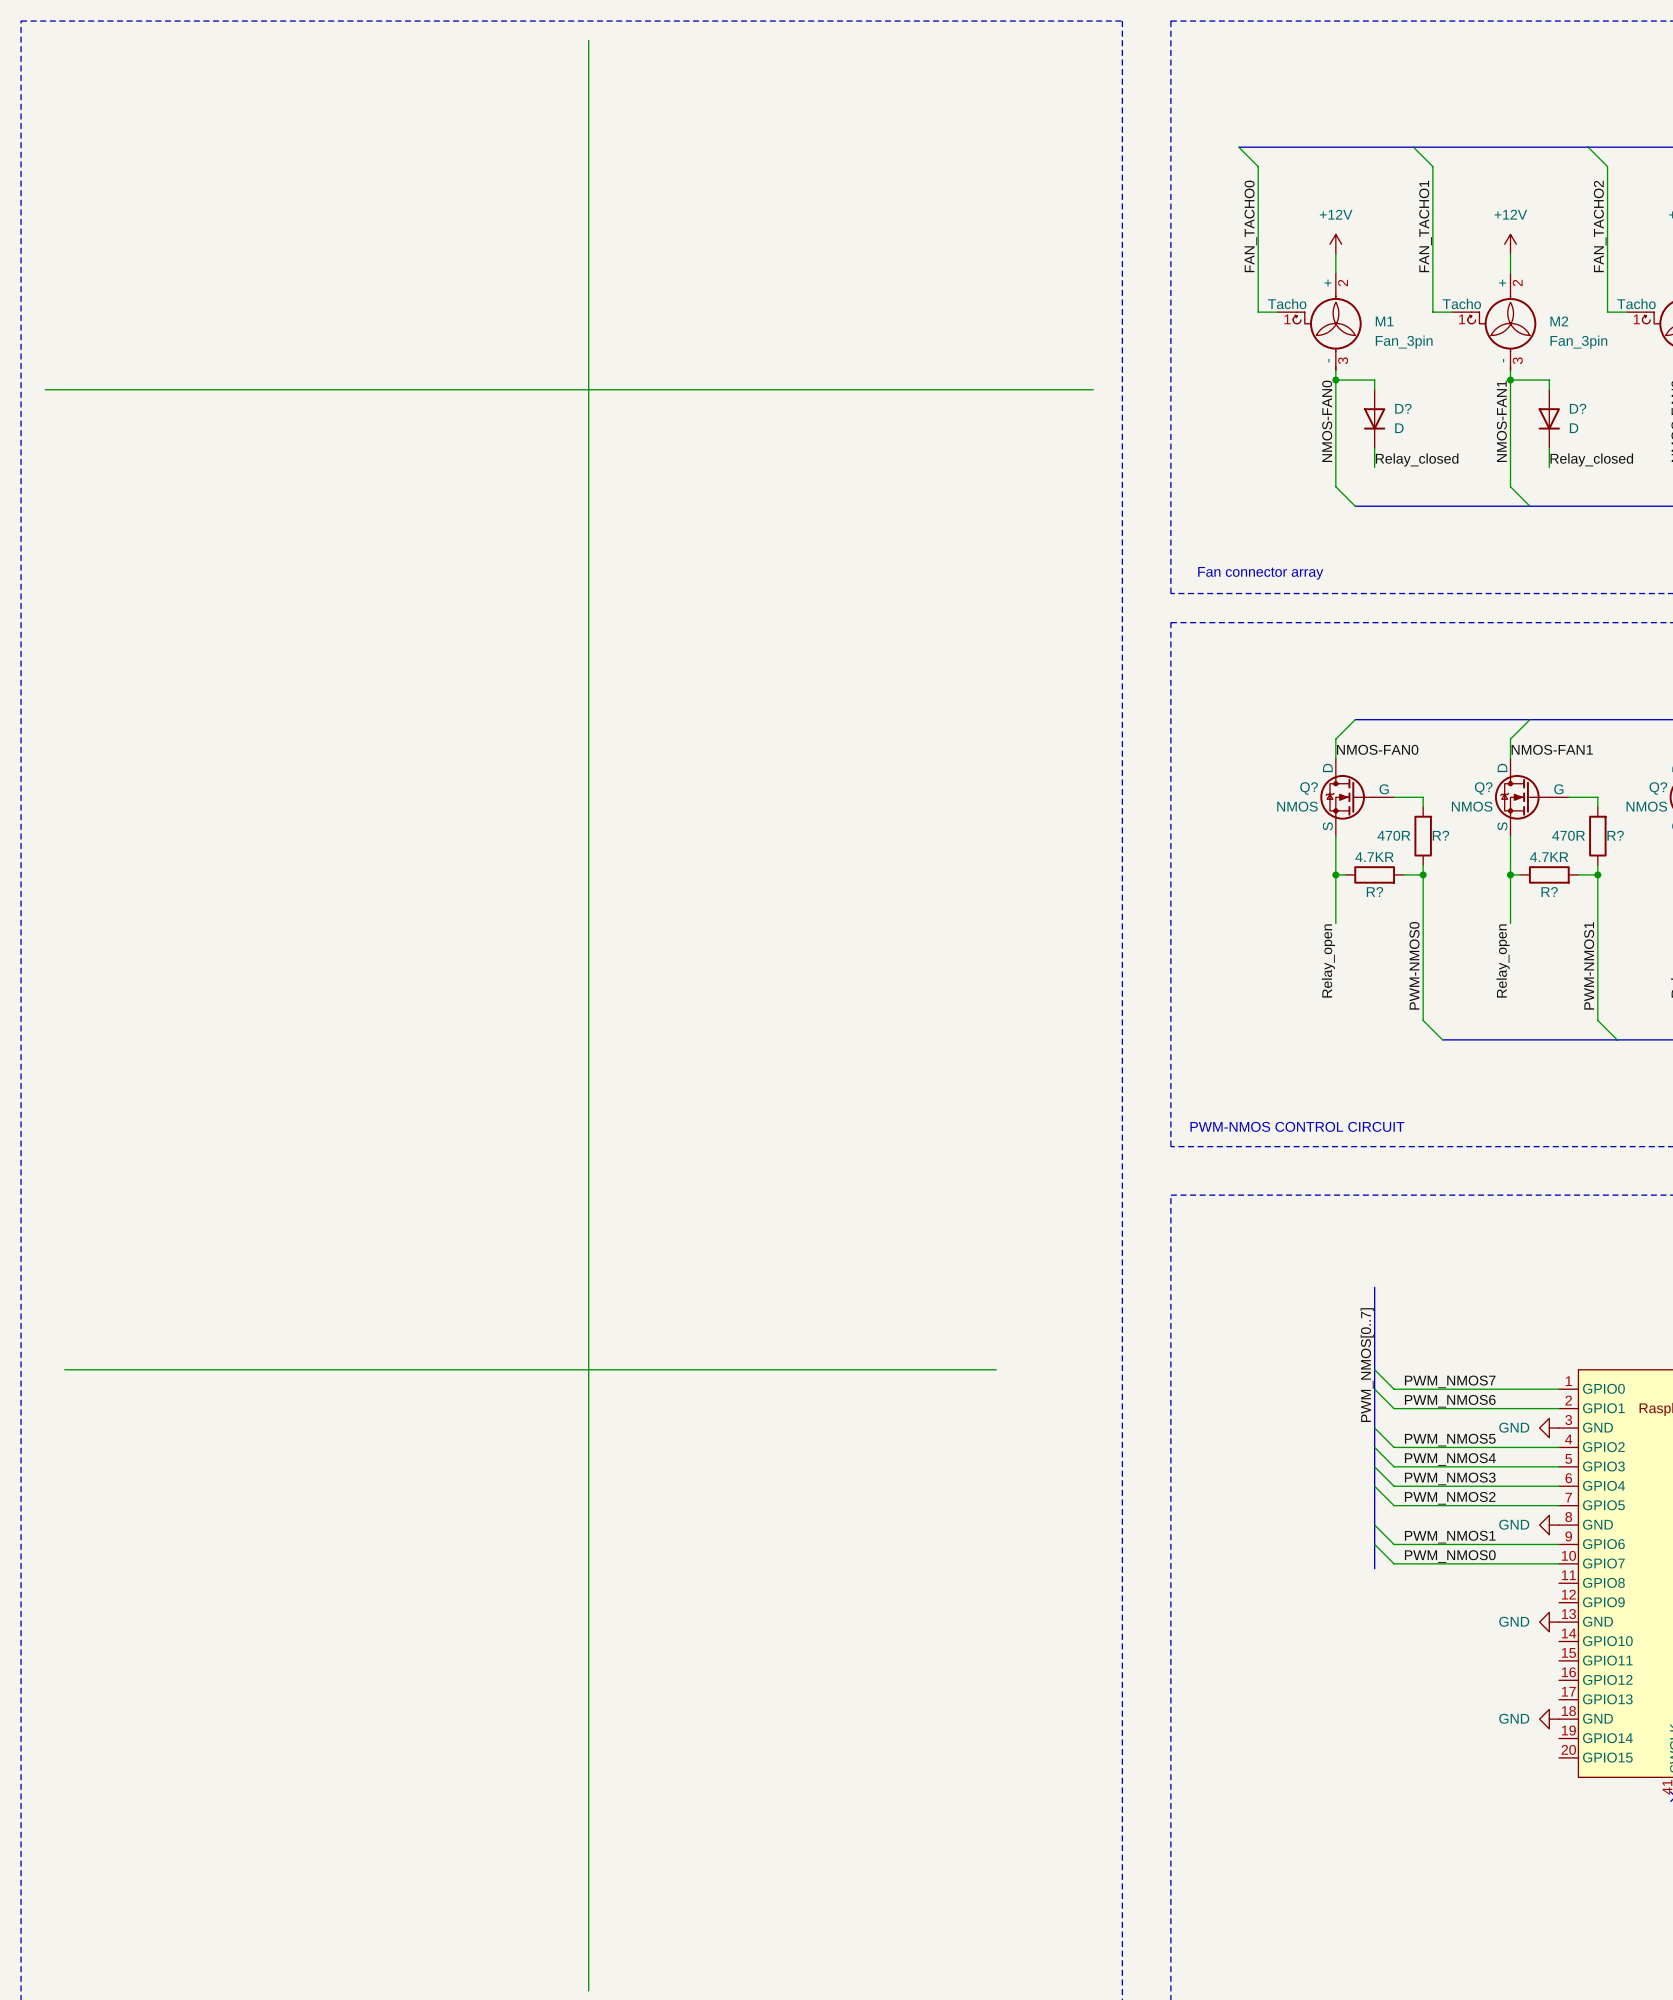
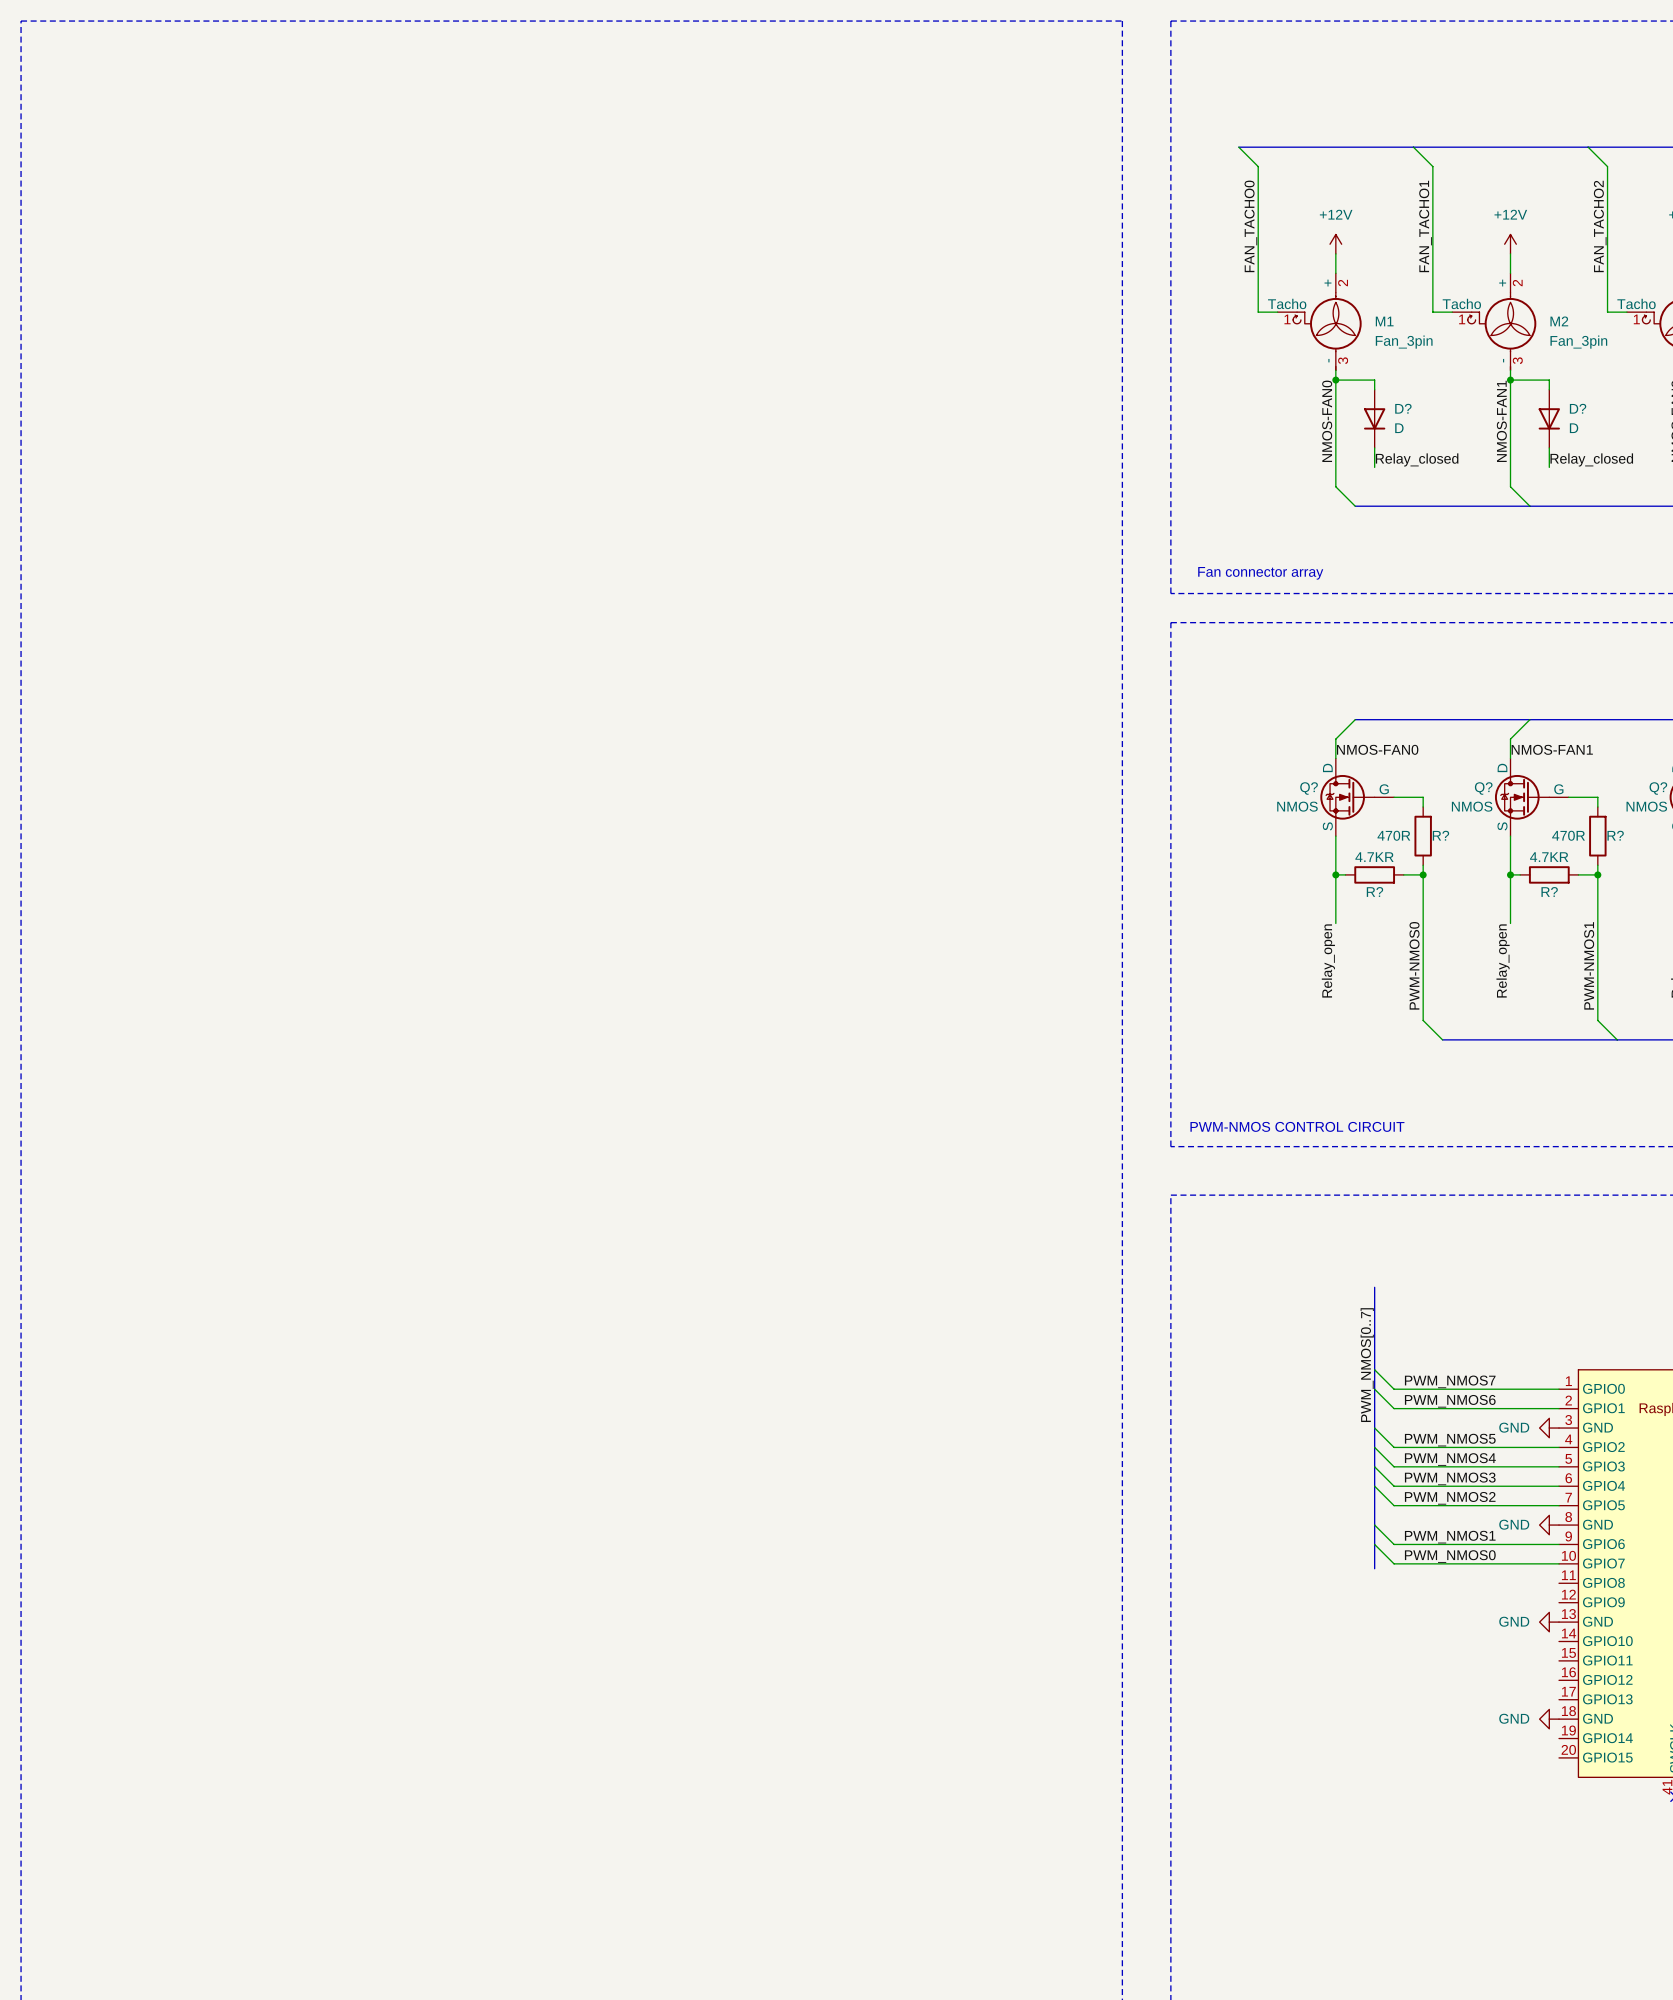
wire: (588, 40) (588, 1990) -> none
wire: (45, 389) (1093, 389) -> none
wire: (64, 1369) (996, 1369) -> none

